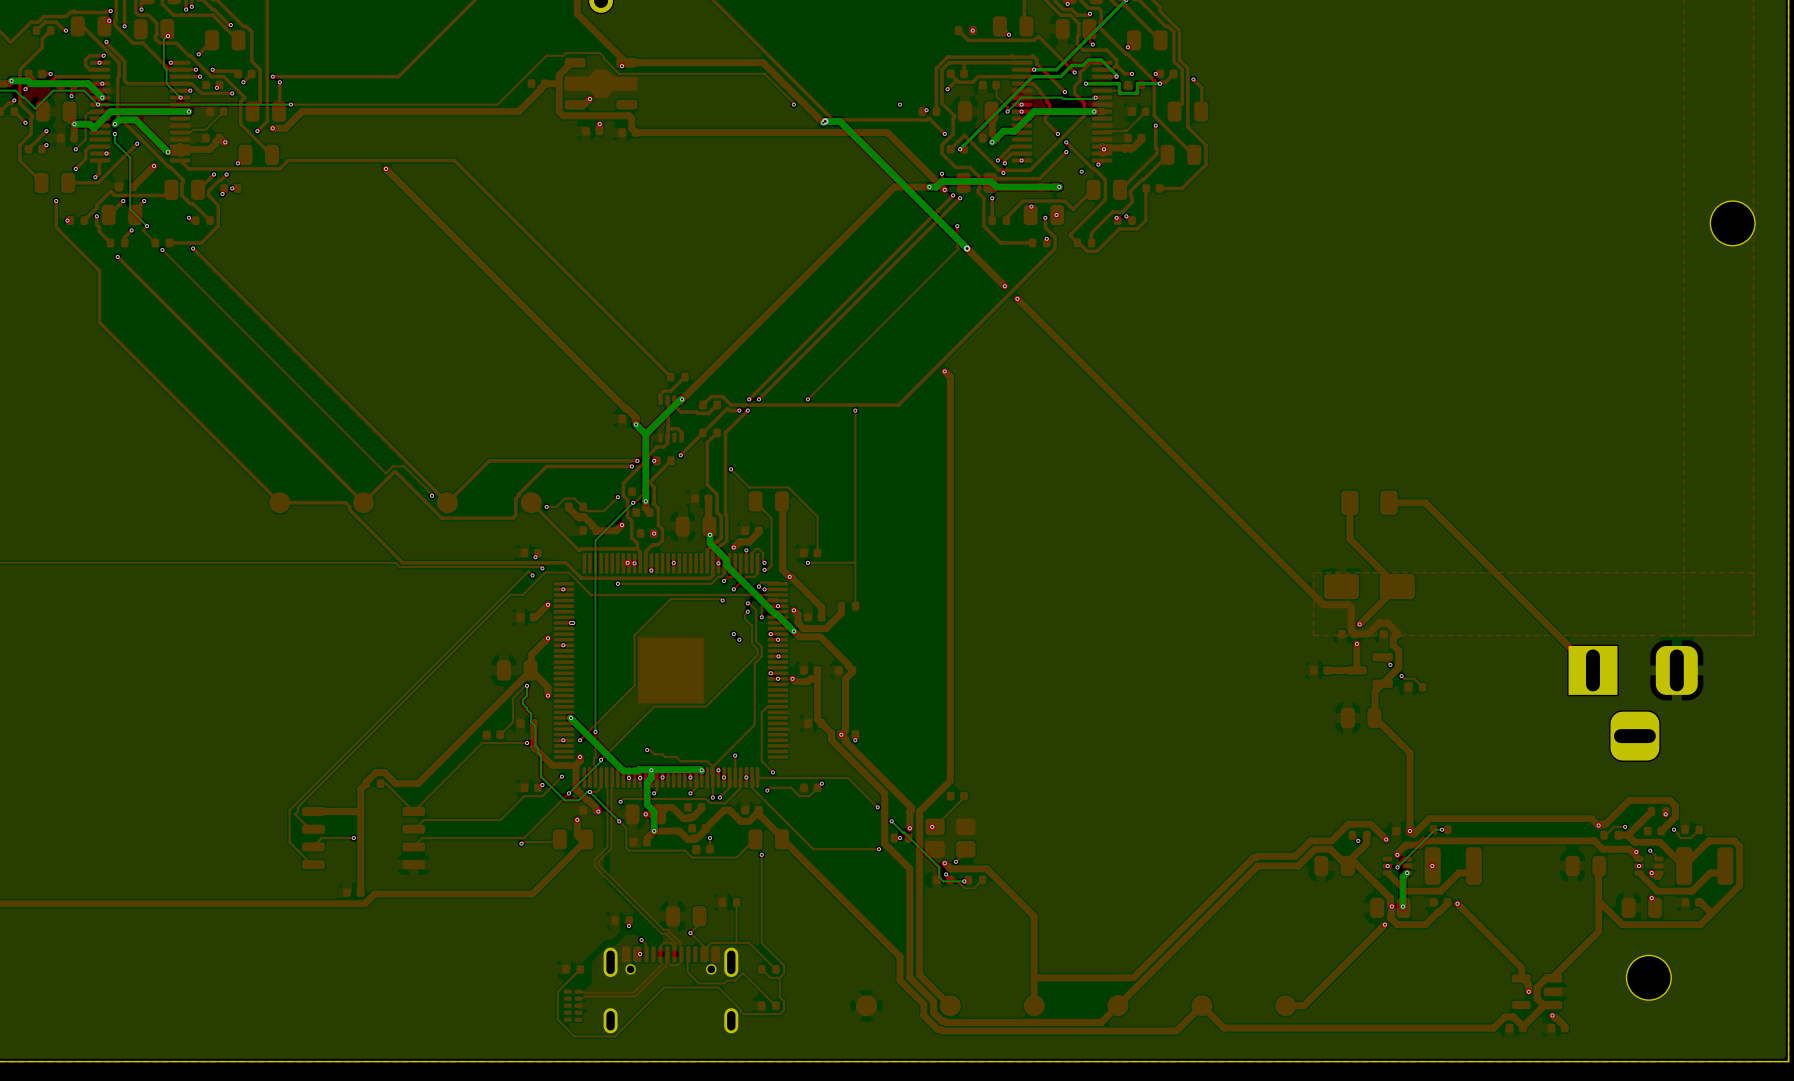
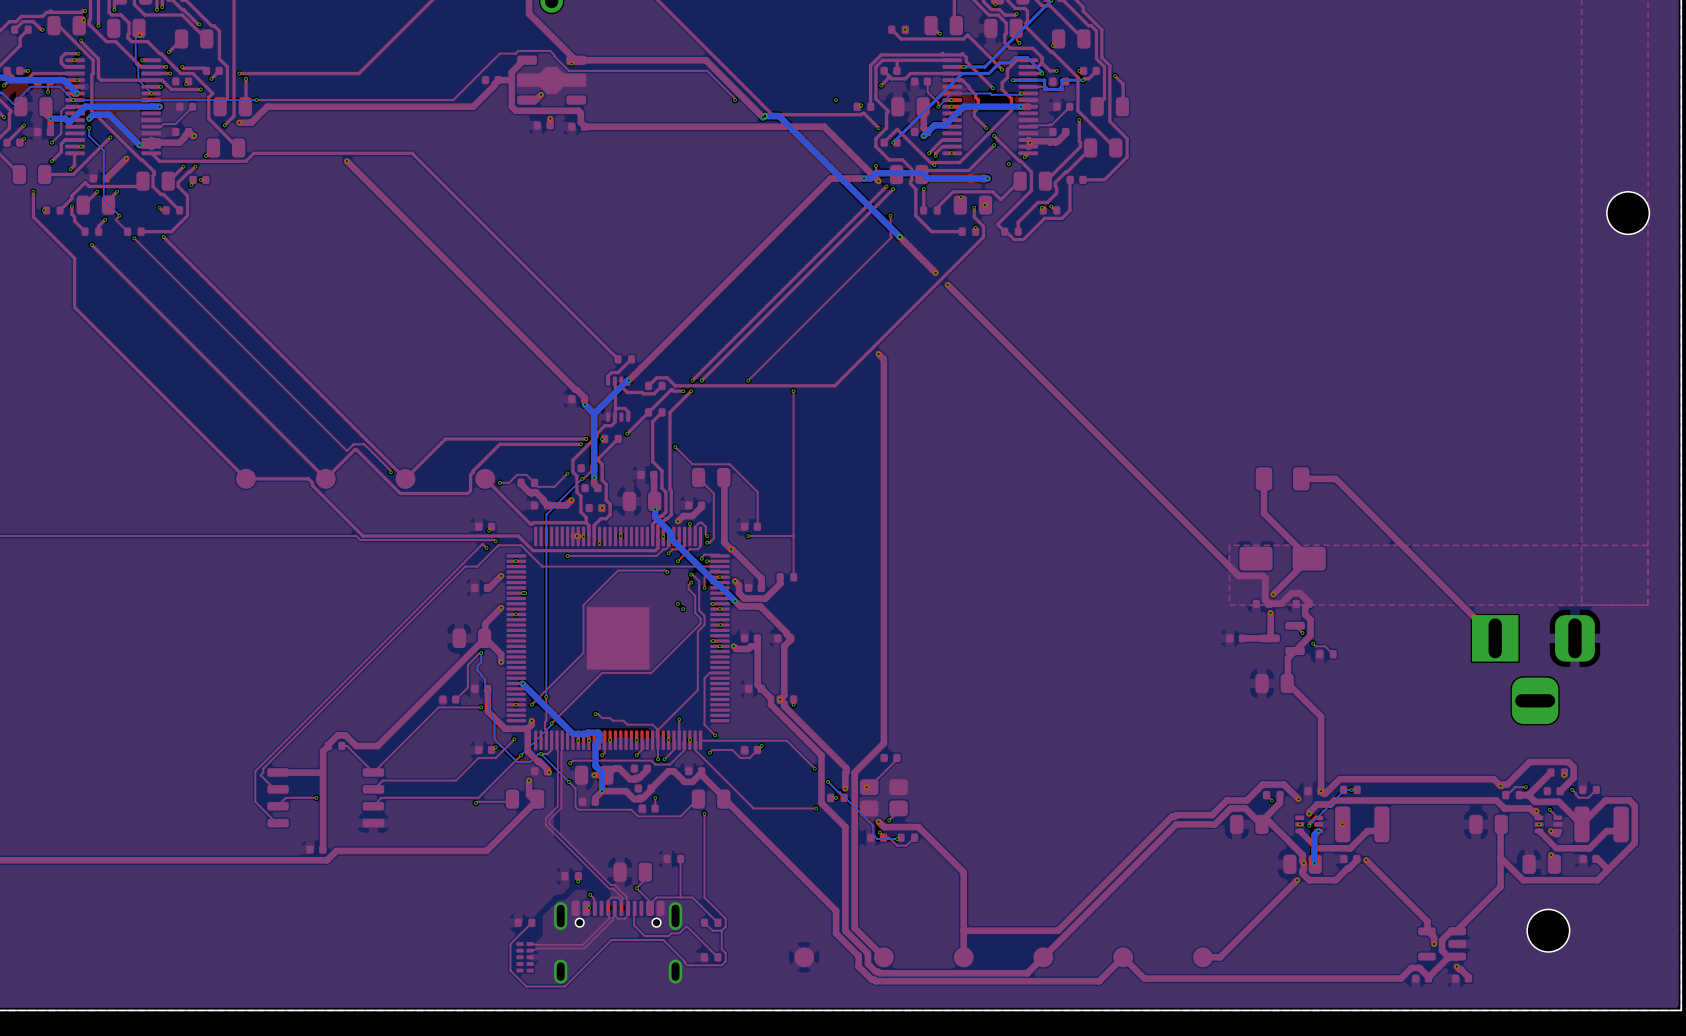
via: (651, 770) -> none
via: (701, 770) -> none
via: (718, 770) -> none
bottom track: (701, 771) (651, 771) -> none

